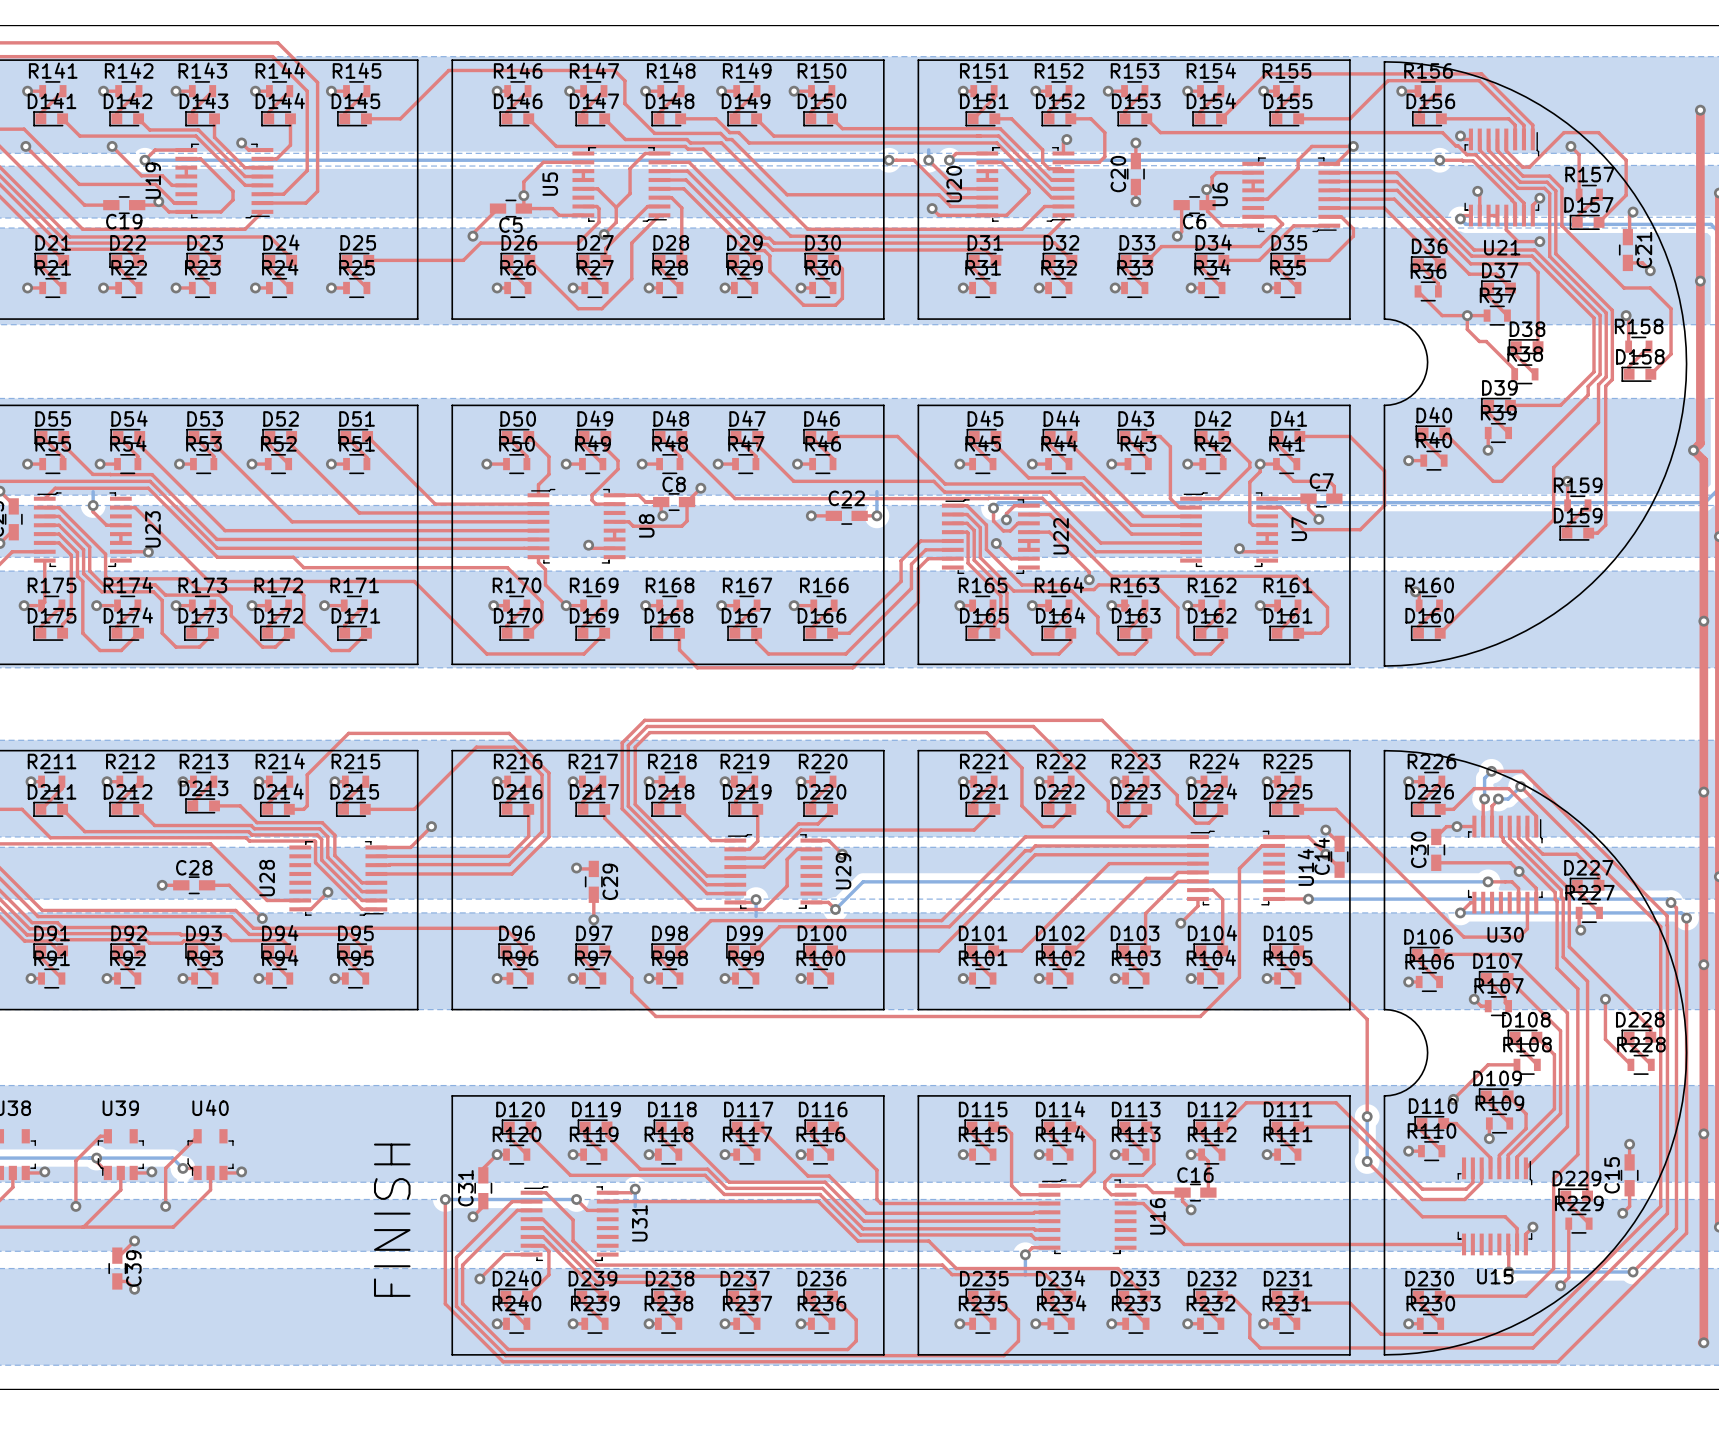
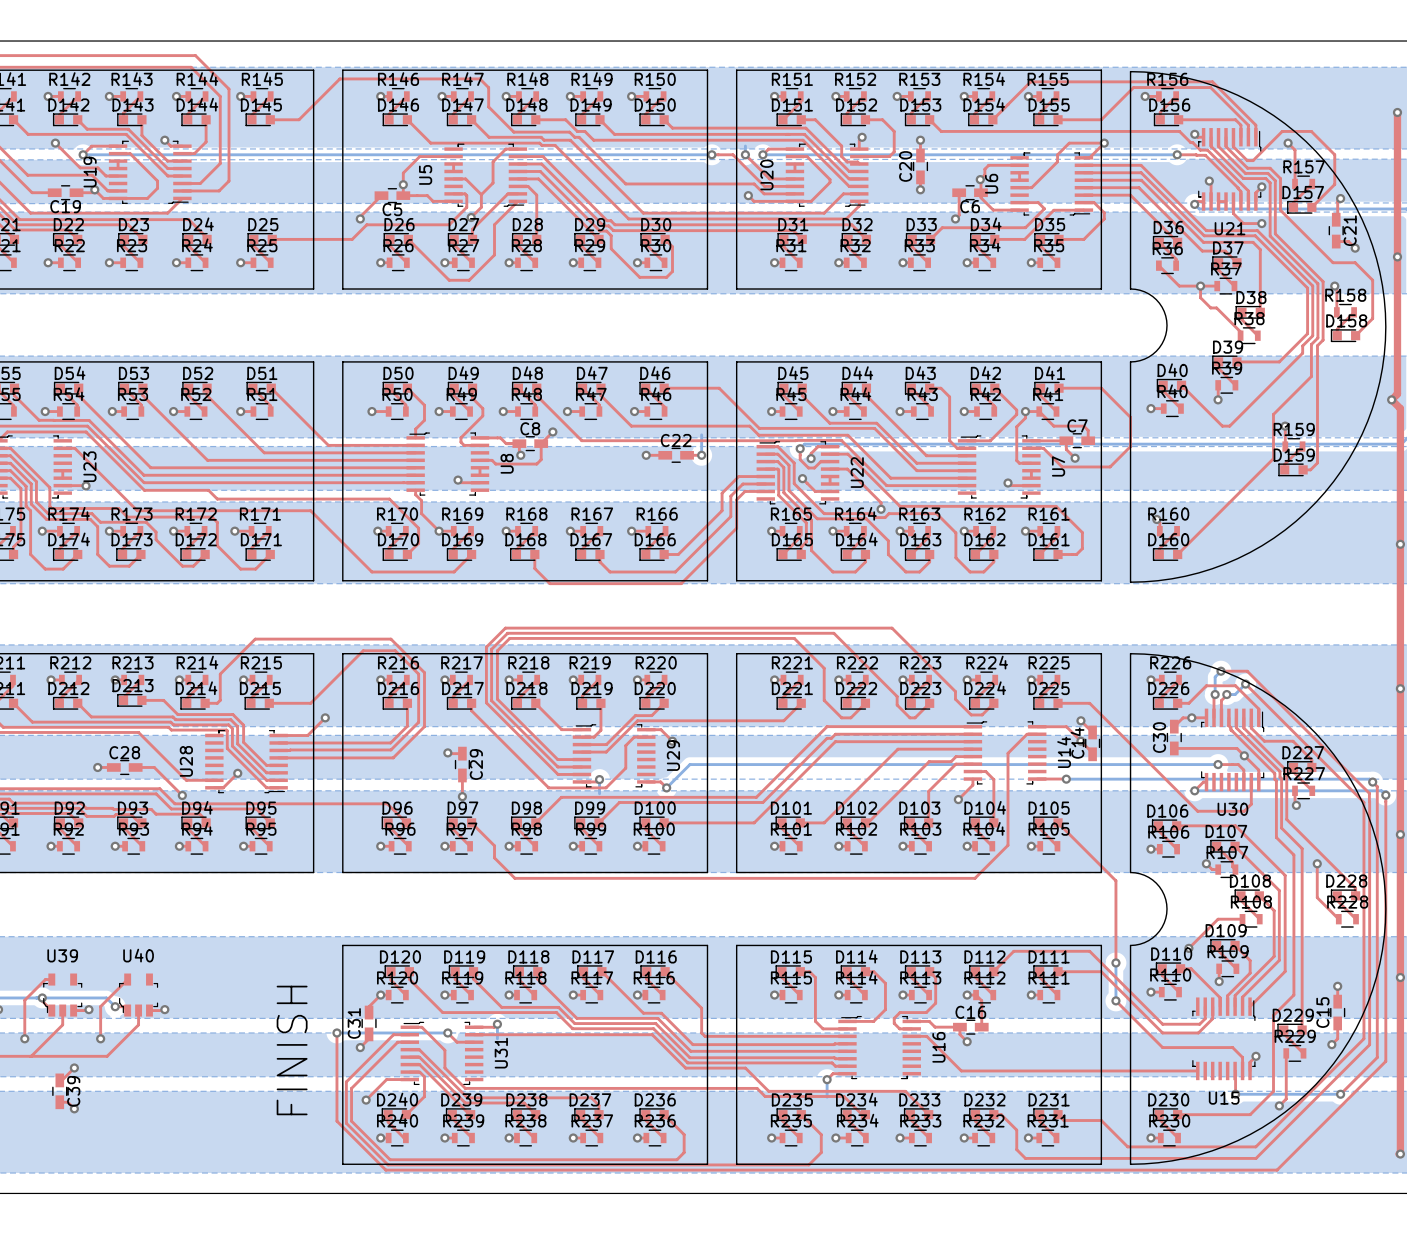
bottom track: (93, 491) (93, 505) -> none
top track: (93, 505) (93, 511) (106, 525) (120, 525) -> none
via: (93, 505) -> none

